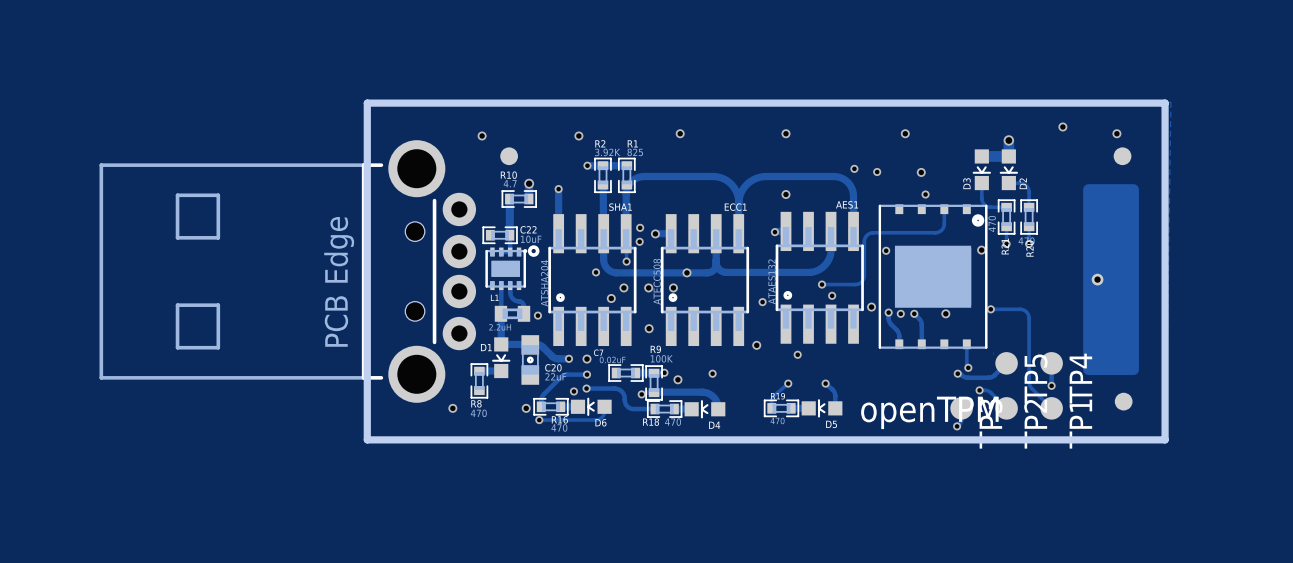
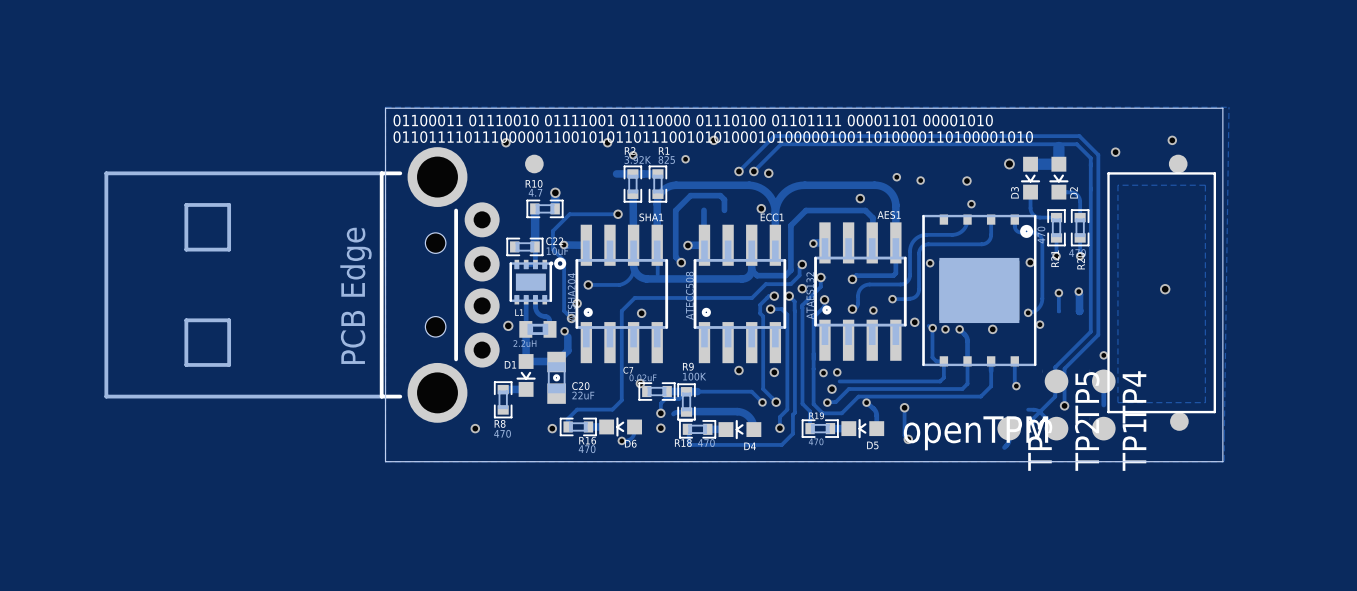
board edge width: thick (367, 103) (1165, 103) (1165, 439) (367, 439) (367, 103) -> thin (385, 108) (1222, 108) (1222, 461) (385, 461) (385, 108)
text: none -> 01100011 01110010 01111001 01110000 01110100 01101111 00001101 00001010 (693, 120)
via position: (1062, 126) -> (1115, 152)
text: none -> 011011110111000001100101011011100101010001010000010011010000110100001010 (713, 137)
via: (786, 133) -> none
via: (905, 133) -> none
via position: (1008, 140) -> (1009, 163)
via: none -> (685, 159)
track: none -> (738, 171) (774, 136) (1079, 136) (1098, 155) (1098, 334) (1064, 368) (1064, 405)
via: none -> (738, 171)
track: none -> (753, 171) (781, 144) (1076, 144) (1090, 158) (1090, 331) (1055, 367) (1055, 396) (1032, 418) (1032, 424)
via: none -> (753, 171)
via position: (587, 165) -> (633, 155)
via: none -> (768, 173)
line: none -> (1108, 173) (1214, 173) (1214, 412) (1108, 412) (1108, 173)
zone outline: none -> (1117, 185) (1205, 185) (1205, 402) (1117, 402) (1117, 185)
track: (558, 189) (558, 233) -> (564, 245) (586, 245)
via: (558, 189) -> none
via: none -> (860, 198)
via: (786, 194) -> none
via: none -> (761, 208)
track: none -> (703, 210) (704, 245) (703, 229)
track: none -> (724, 210) (724, 199) (720, 195) (690, 195) (675, 210) (675, 257) (681, 262) (677, 258)
track: none -> (618, 214) (569, 214) (552, 231) (552, 249) (564, 260) (564, 311) (571, 318)
via: none -> (618, 214)
track: none -> (967, 219) (964, 228) (958, 233) (924, 235) (916, 238) (910, 247) (909, 276) (907, 281) (901, 284) (863, 286) (858, 293) (857, 306) (852, 309)
track: none -> (1014, 219) (1015, 227) (1017, 231) (1036, 233) (1042, 240) (1042, 300) (1038, 308) (1028, 312)
via: (640, 227) -> none
track: (831, 231) (829, 258) (824, 265) (813, 271) (725, 272) (718, 268) (716, 260) -> (872, 242) (872, 217) (865, 210) (805, 210) (790, 225) (790, 270) (785, 275) (757, 275) (751, 270) (748, 276) (743, 278) (646, 278) (636, 273) (633, 263) (632, 275) (624, 283) (588, 284)
track: none -> (895, 242) (895, 273) (893, 275) (856, 275) (852, 279)
track: (884, 232) (871, 233) (865, 238) (864, 276) (860, 282) (855, 284) (822, 284) -> (928, 244) (922, 246) (919, 251) (917, 294) (909, 299) (892, 299)
via: none -> (564, 245)
via: (639, 241) -> none
via: none -> (681, 262)
track: (603, 251) (605, 266) (616, 272) (709, 272) (715, 267) (716, 257) -> none
via: none -> (802, 264)
via: (626, 261) -> none
via: none -> (820, 277)
track: none -> (824, 277) (820, 277) (820, 286) (802, 305) (802, 307)
via: none -> (852, 279)
via: none -> (588, 284)
via: (596, 272) -> none
via: (686, 272) -> none
via: none -> (802, 288)
via: none -> (1165, 289)
track: none -> (1078, 291) (1079, 311)
via: none -> (1078, 291)
track: none -> (1058, 293) (1058, 311)
via: none -> (1058, 293)
part: (1111, 279) -> none
track: none -> (774, 296) (768, 296) (760, 304) (760, 313) (763, 316) (763, 389) (776, 402)
via: none -> (774, 296)
track: none -> (789, 296) (794, 301) (794, 310)
via: none -> (789, 296)
via position: (822, 284) -> (892, 299)
track: none -> (824, 299) (824, 306) (813, 317) (813, 404) (822, 413) (841, 413) (858, 396) (980, 396) (991, 386) (991, 361) (991, 371)
via: none -> (824, 299)
via: (623, 287) -> none
via: (648, 287) -> none
via: (673, 287) -> none
via: none -> (577, 303)
track: none -> (770, 309) (781, 309) (787, 314) (787, 409) (779, 417) (779, 428)
via: none -> (770, 309)
via: none -> (852, 309)
via: none -> (1028, 312)
via: (762, 302) -> none
via: none -> (571, 318)
track: (990, 309) (1021, 309) (1027, 313) (1029, 384) (1051, 408) -> none
via: none -> (508, 325)
track: none -> (928, 325) (932, 329) (932, 357) (936, 361) (943, 361) (943, 377) (940, 381) (839, 381)
track: (888, 312) (889, 322) (898, 333) (899, 344) -> none
via: (649, 328) -> none
via: none -> (1103, 355)
track: (530, 344) (540, 345) (554, 358) (568, 358) -> (556, 362) (567, 350) (567, 337)
track: none -> (967, 361) (967, 383) (962, 389) (848, 389) (835, 402) (828, 402)
via: (756, 345) -> none
via: none -> (738, 370)
via: none -> (774, 372)
via: none -> (823, 373)
via: (568, 358) -> none
via position: (587, 359) -> (640, 383)
track: (1006, 363) (990, 377) (967, 377) (957, 373) -> none
via: none -> (832, 389)
via: (664, 372) -> none
via position: (712, 373) -> (762, 402)
via: (957, 373) -> none
track: (587, 374) (563, 375) (543, 394) (541, 400) -> (802, 264) (799, 267) (799, 275) (790, 284) (765, 284) (752, 297) (634, 297) (621, 311) (621, 400) (612, 409) (577, 409) (568, 420)
via: (587, 374) -> none
via: (677, 379) -> none
track: none -> (762, 402) (751, 391) (686, 391) (679, 398) (665, 398) (660, 403) (660, 413)
via: none -> (776, 402)
track: (788, 383) (773, 396) (771, 408) -> (802, 307) (802, 403) (810, 411) (810, 428)
via: (1051, 385) -> none
via: none -> (1064, 405)
track: (586, 388) (617, 388) (623, 393) (625, 403) (629, 407) (654, 409) -> (794, 311) (794, 412) (792, 414) (792, 433) (781, 444) (690, 444) (687, 429)
via: (586, 388) -> none
track: none -> (904, 407) (904, 435) (908, 439)
via: none -> (904, 407)
via: (979, 390) -> none
via: (573, 391) -> none
via: none -> (660, 413)
via: (641, 394) -> none
via: none -> (660, 428)
via: none -> (779, 428)
via: none -> (908, 439)
track: (539, 420) (592, 420) -> none
via: (539, 420) -> none
via: none -> (621, 440)
via: (957, 426) -> none

